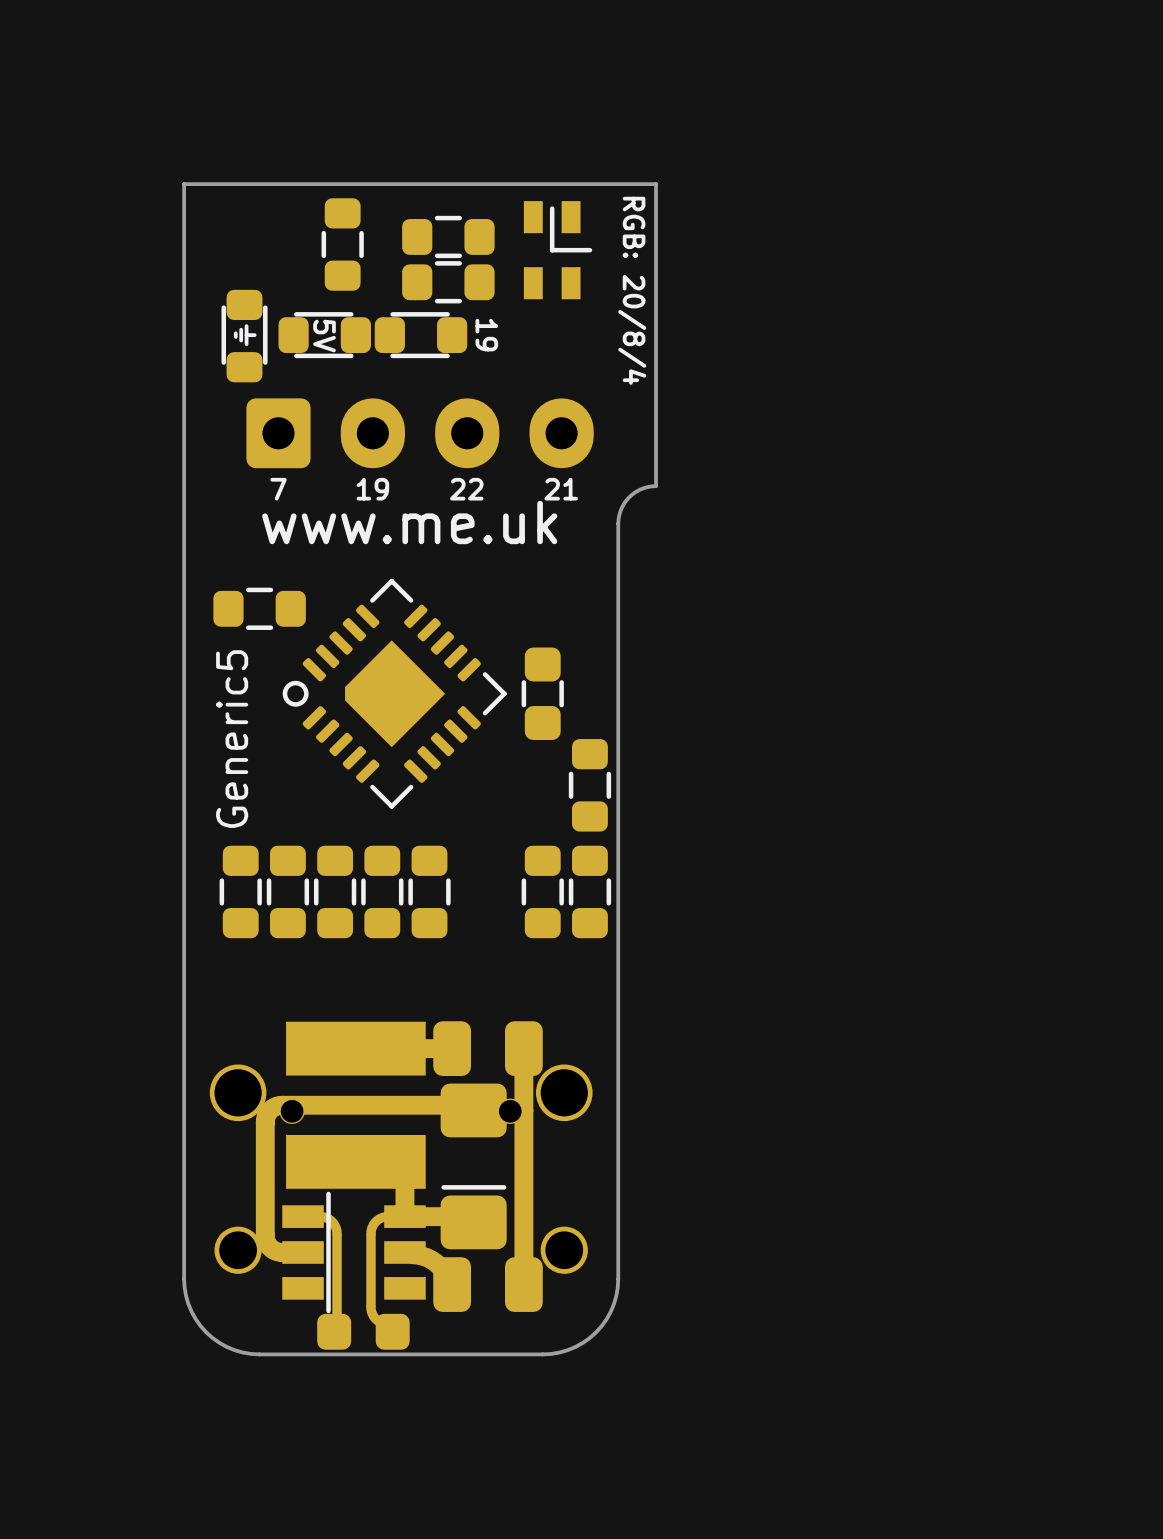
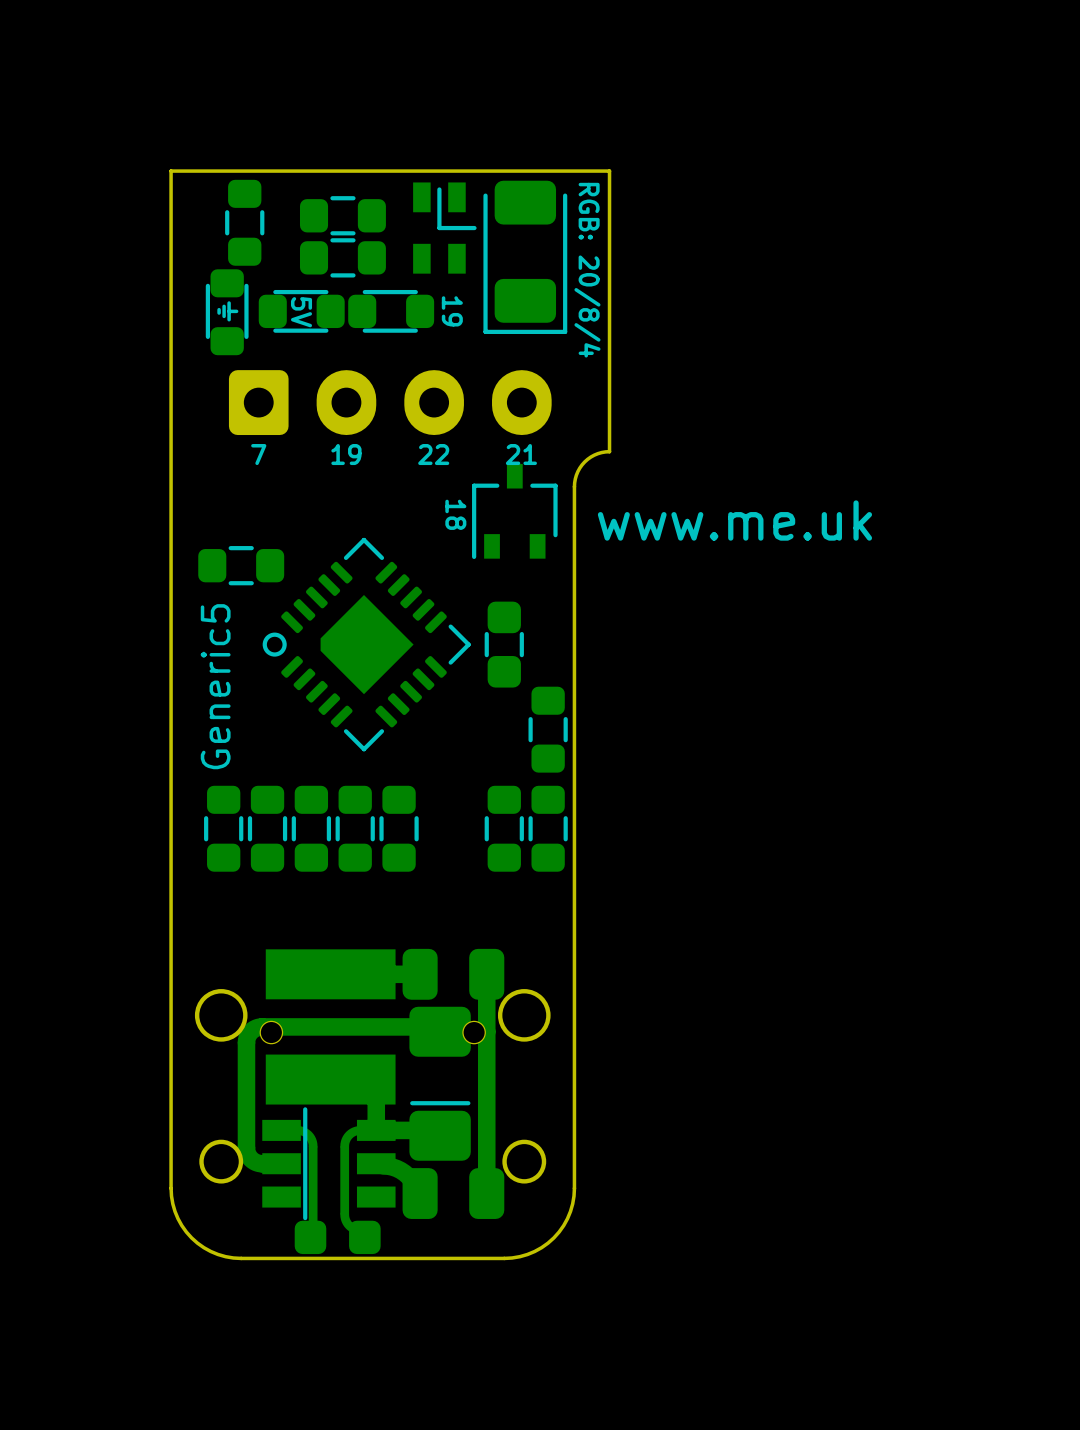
part footprint: [523, 201, 593, 300] -> [483, 180, 568, 334]
part: none -> (342, 215)
part: (448, 236) -> none
part: none -> (244, 222)
part: (342, 244) -> none
part: none -> (444, 228)
part: none -> (342, 257)
part: (448, 282) -> none
text position: www.me.uk (409, 522) -> www.me.uk (734, 520)
part: none -> (514, 511)
text: none -> 18 (455, 514)

